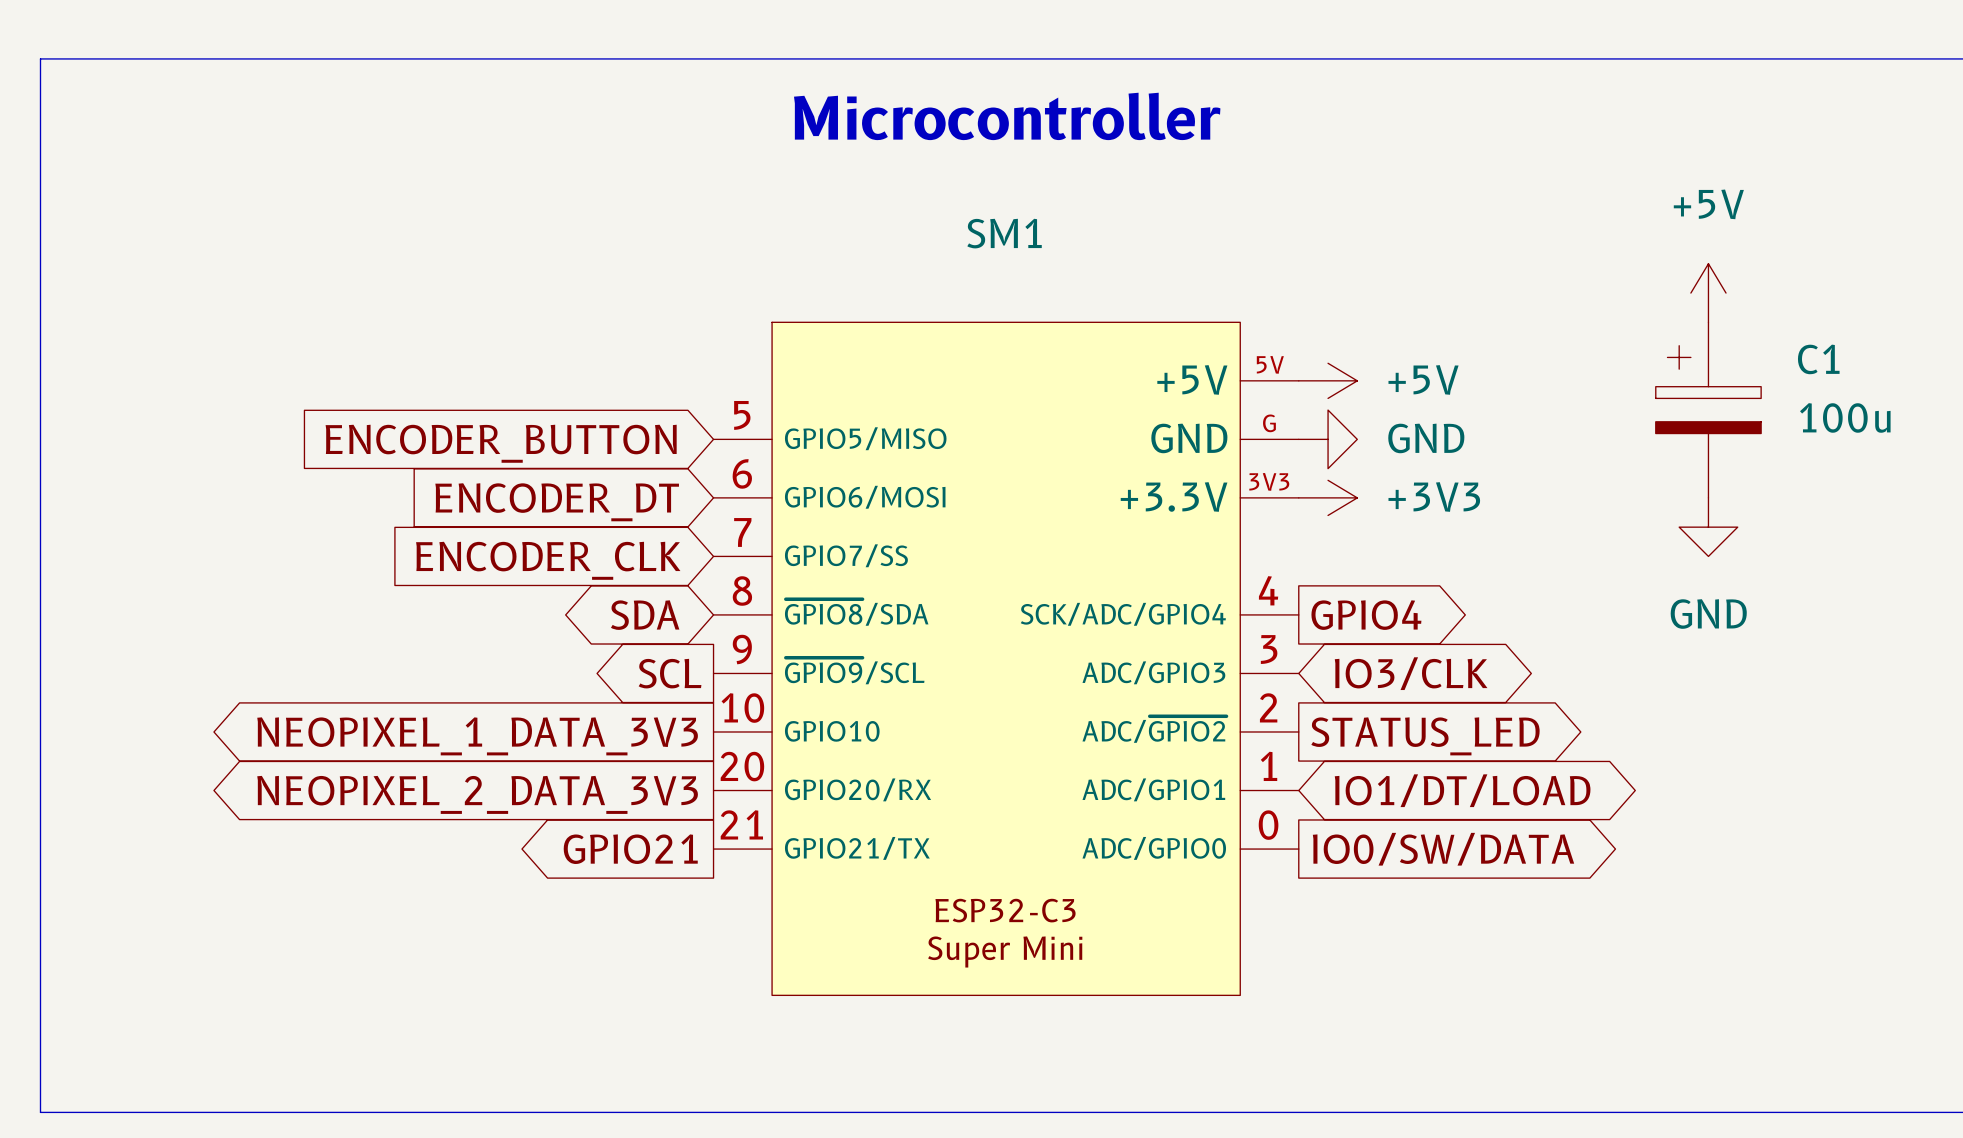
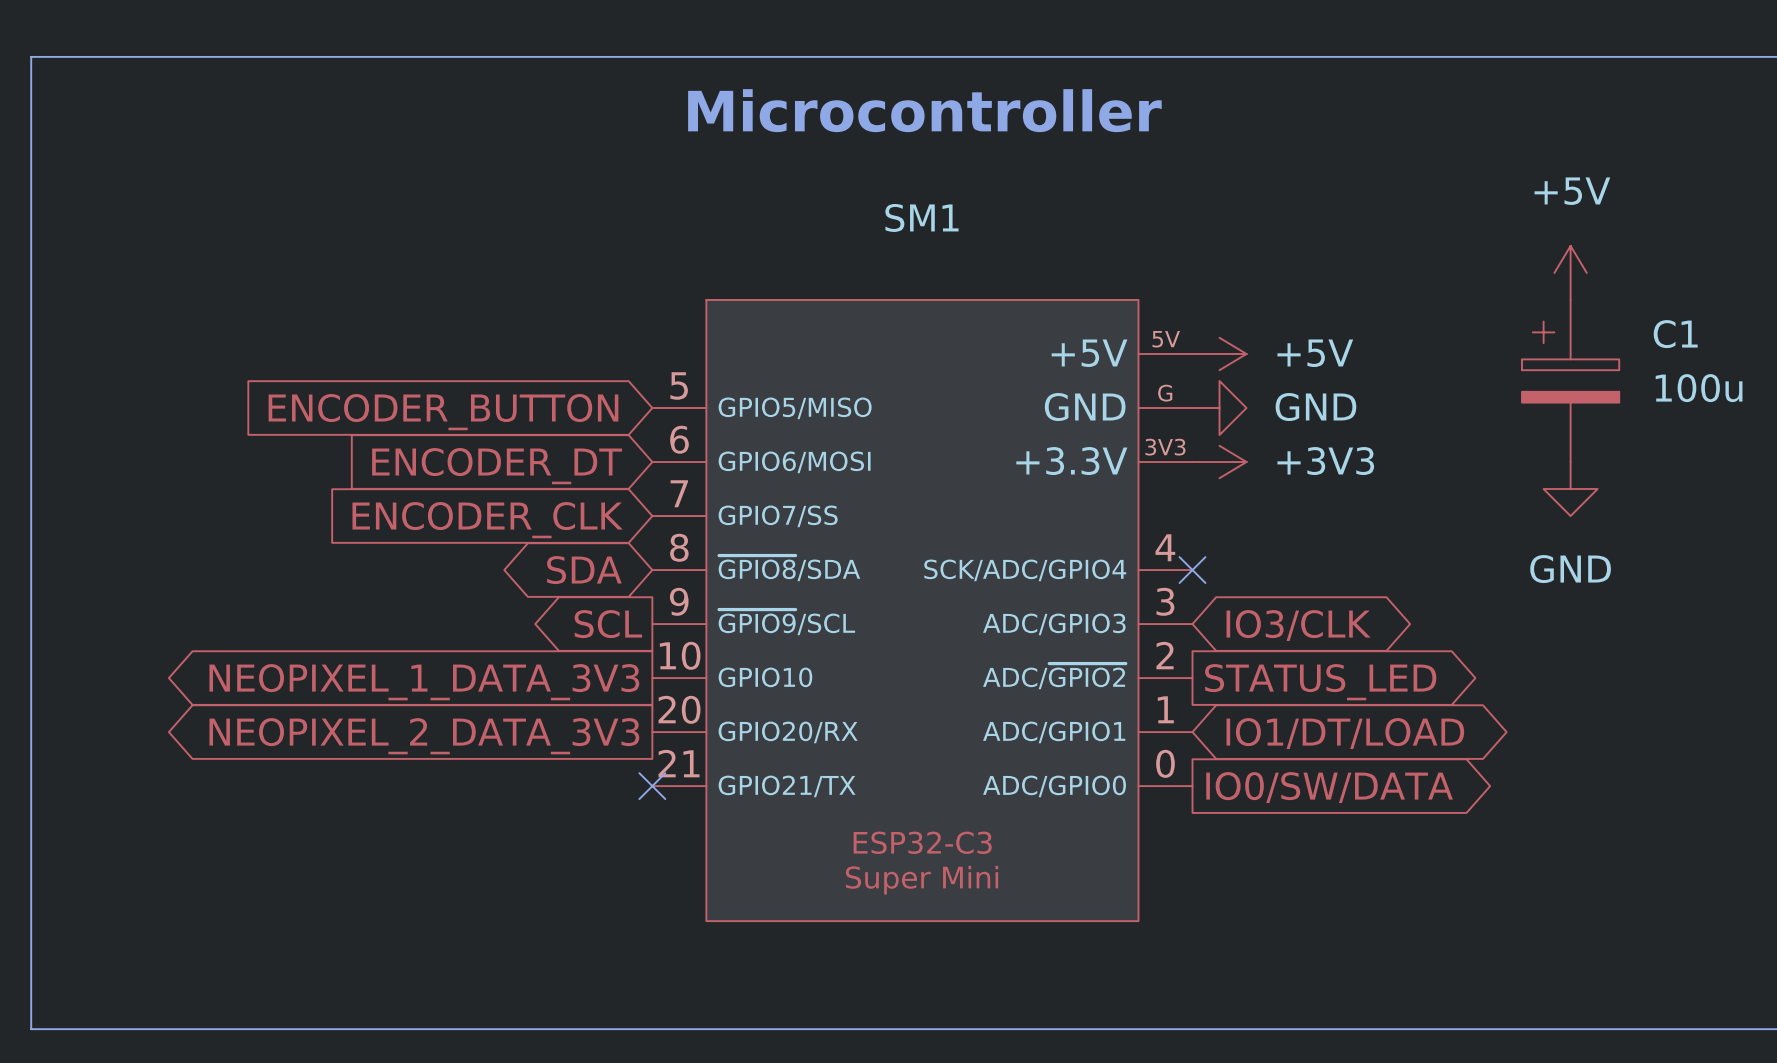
no-connect mark: none -> (1192, 570)
global label: GPIO4 (1366, 615) -> none
global label: GPIO21 (630, 849) -> none
no-connect mark: none -> (652, 786)

